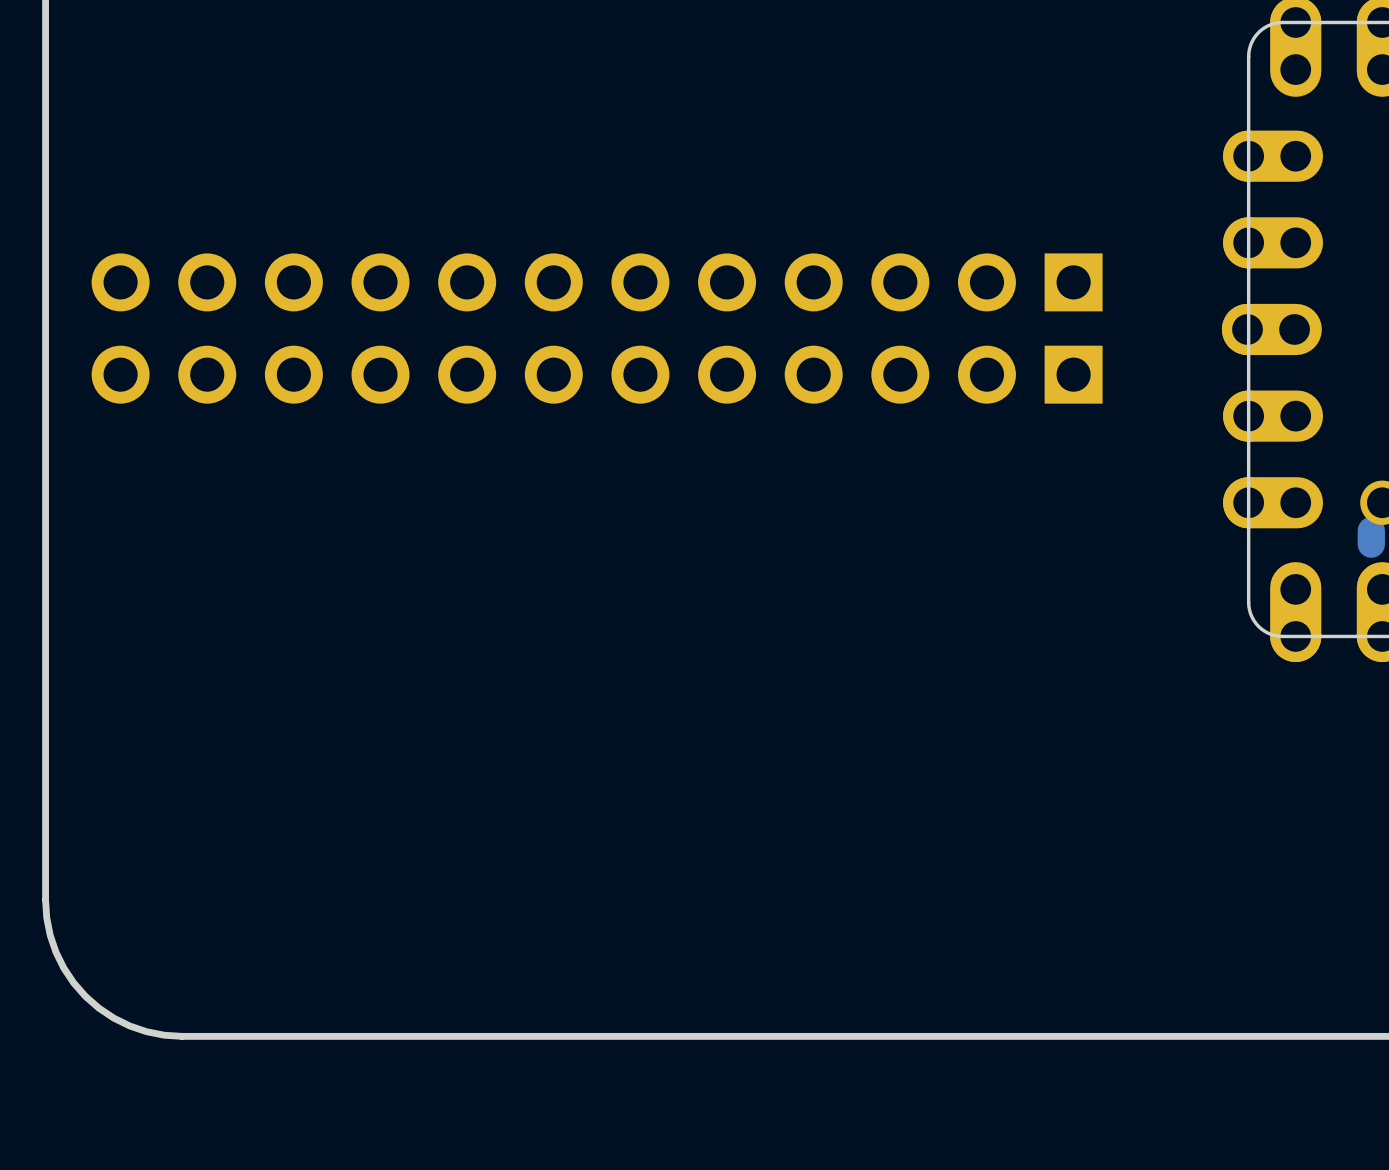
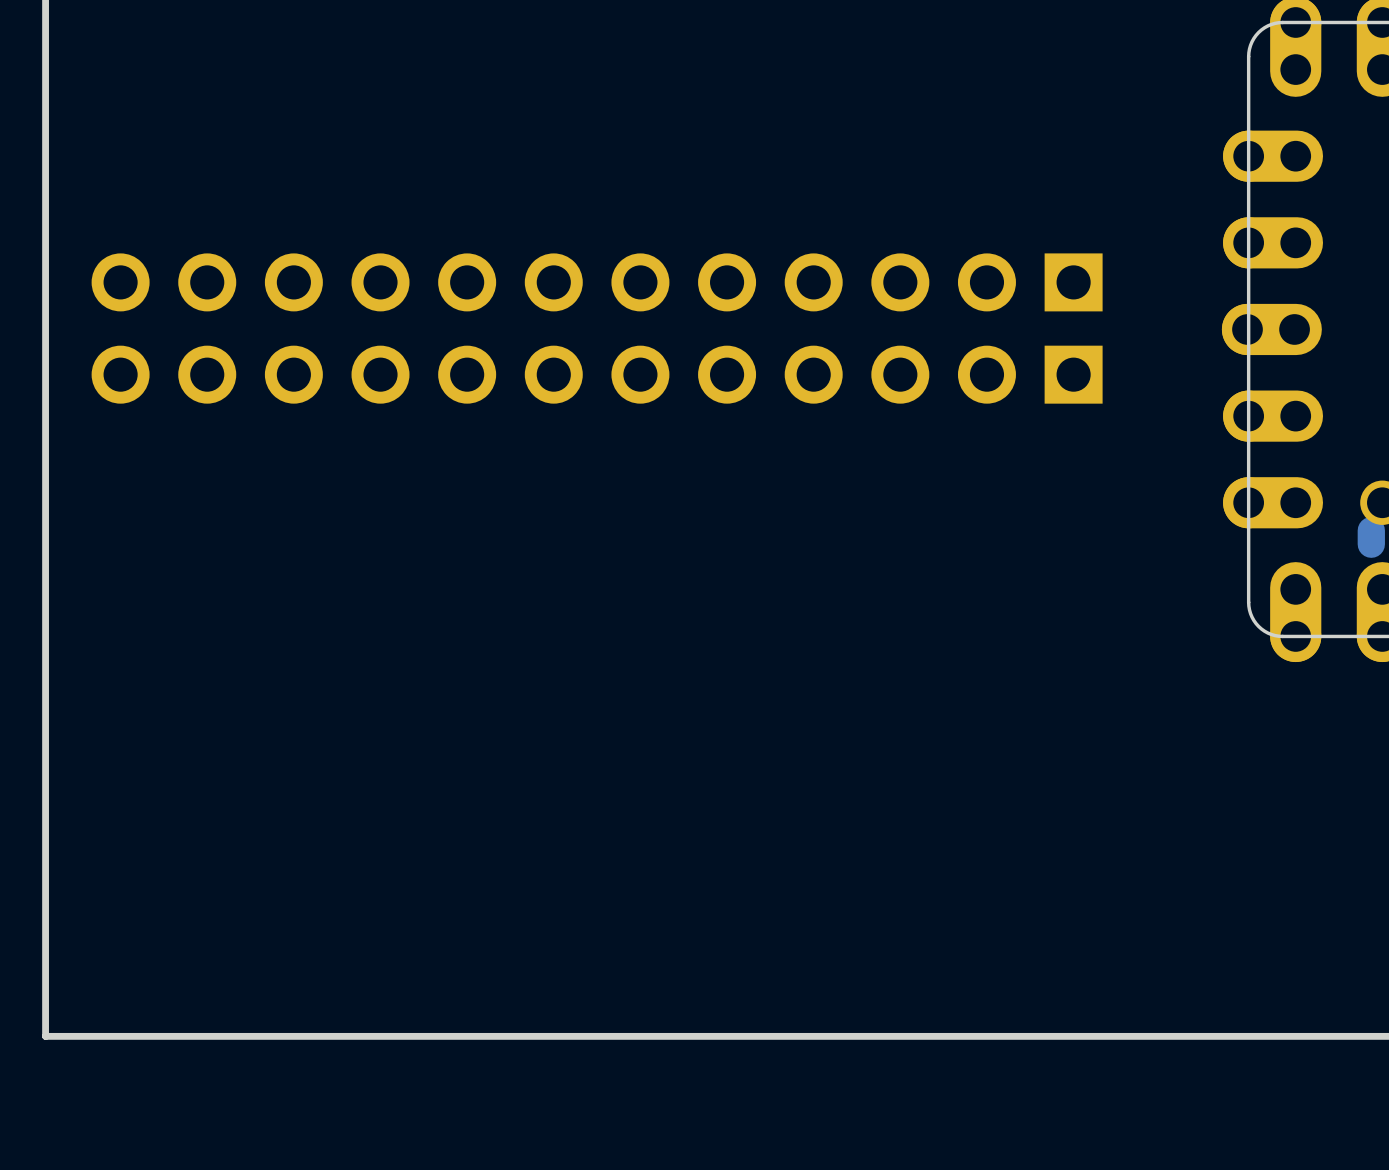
board edge: (45, 899) (46, 917) (55, 952) (63, 968) (85, 996) (98, 1008) (129, 1025) (164, 1035) (182, 1036) -> (45, 899) (45, 1036) (182, 1036)

